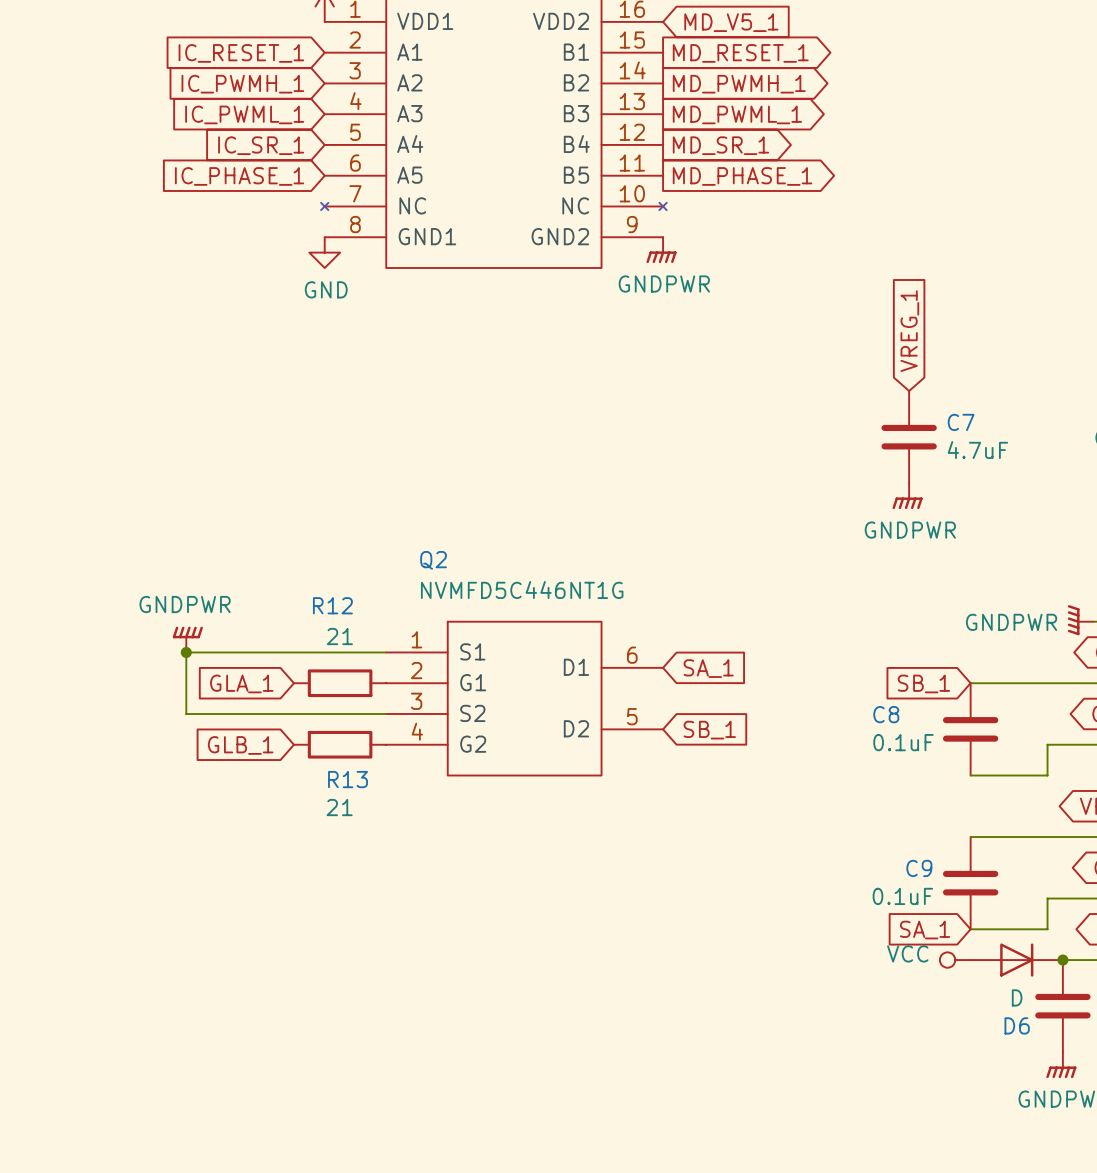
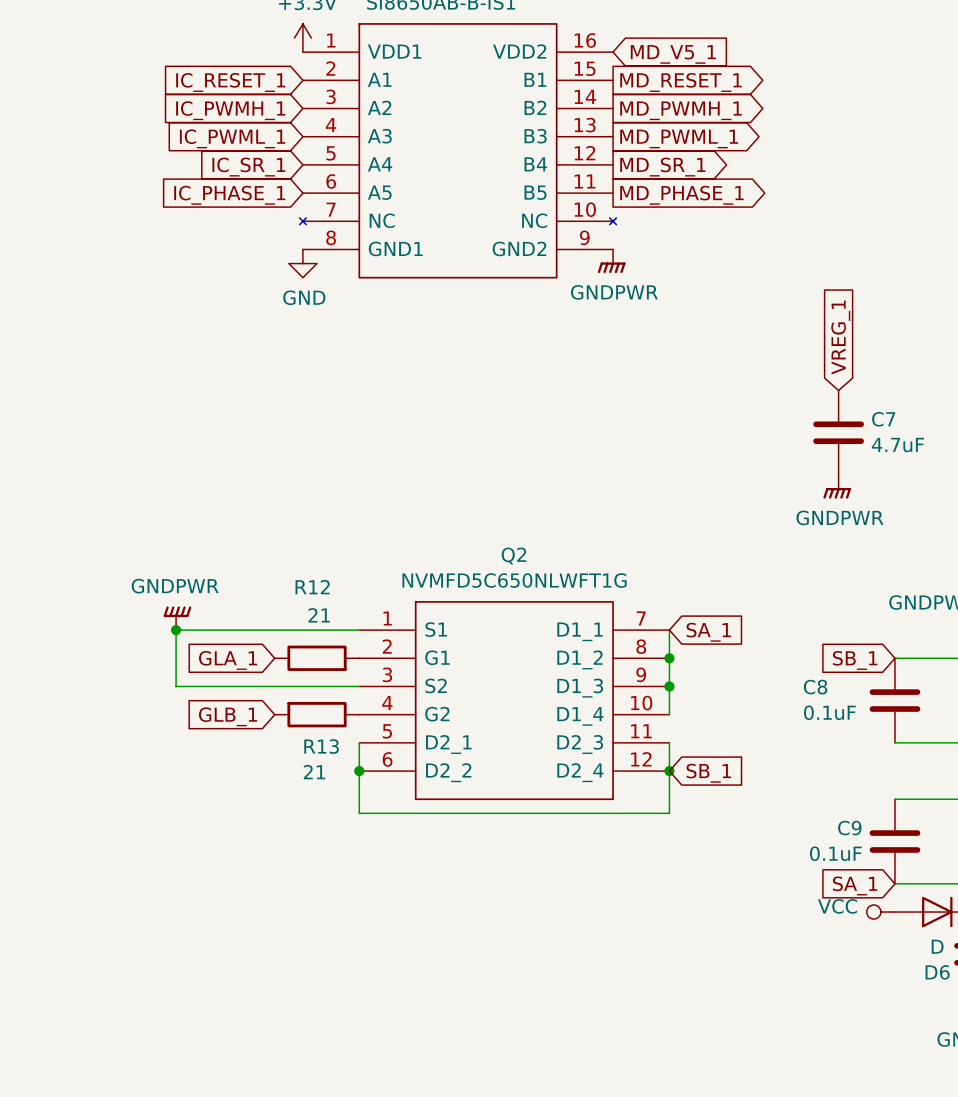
Q2 name position: Q2 (433, 560) -> Q2 (513, 555)
Q2 value: NVMFD5C446NT1G (522, 590) -> NVMFD5C650NLWFT1G (514, 580)
Q2 symbol: [386, 620, 664, 777] -> [359, 601, 670, 801]
wire: none -> (669, 630) (669, 714)
global label position: SA_1 (708, 668) -> SA_1 (708, 632)
junction: none -> (669, 658)
junction: none -> (669, 686)
global label position: SB_1 (709, 730) -> SB_1 (708, 773)
wire: none -> (359, 742) (359, 813) (669, 813) (669, 742)
junction: none -> (359, 771)
junction: none -> (669, 771)

